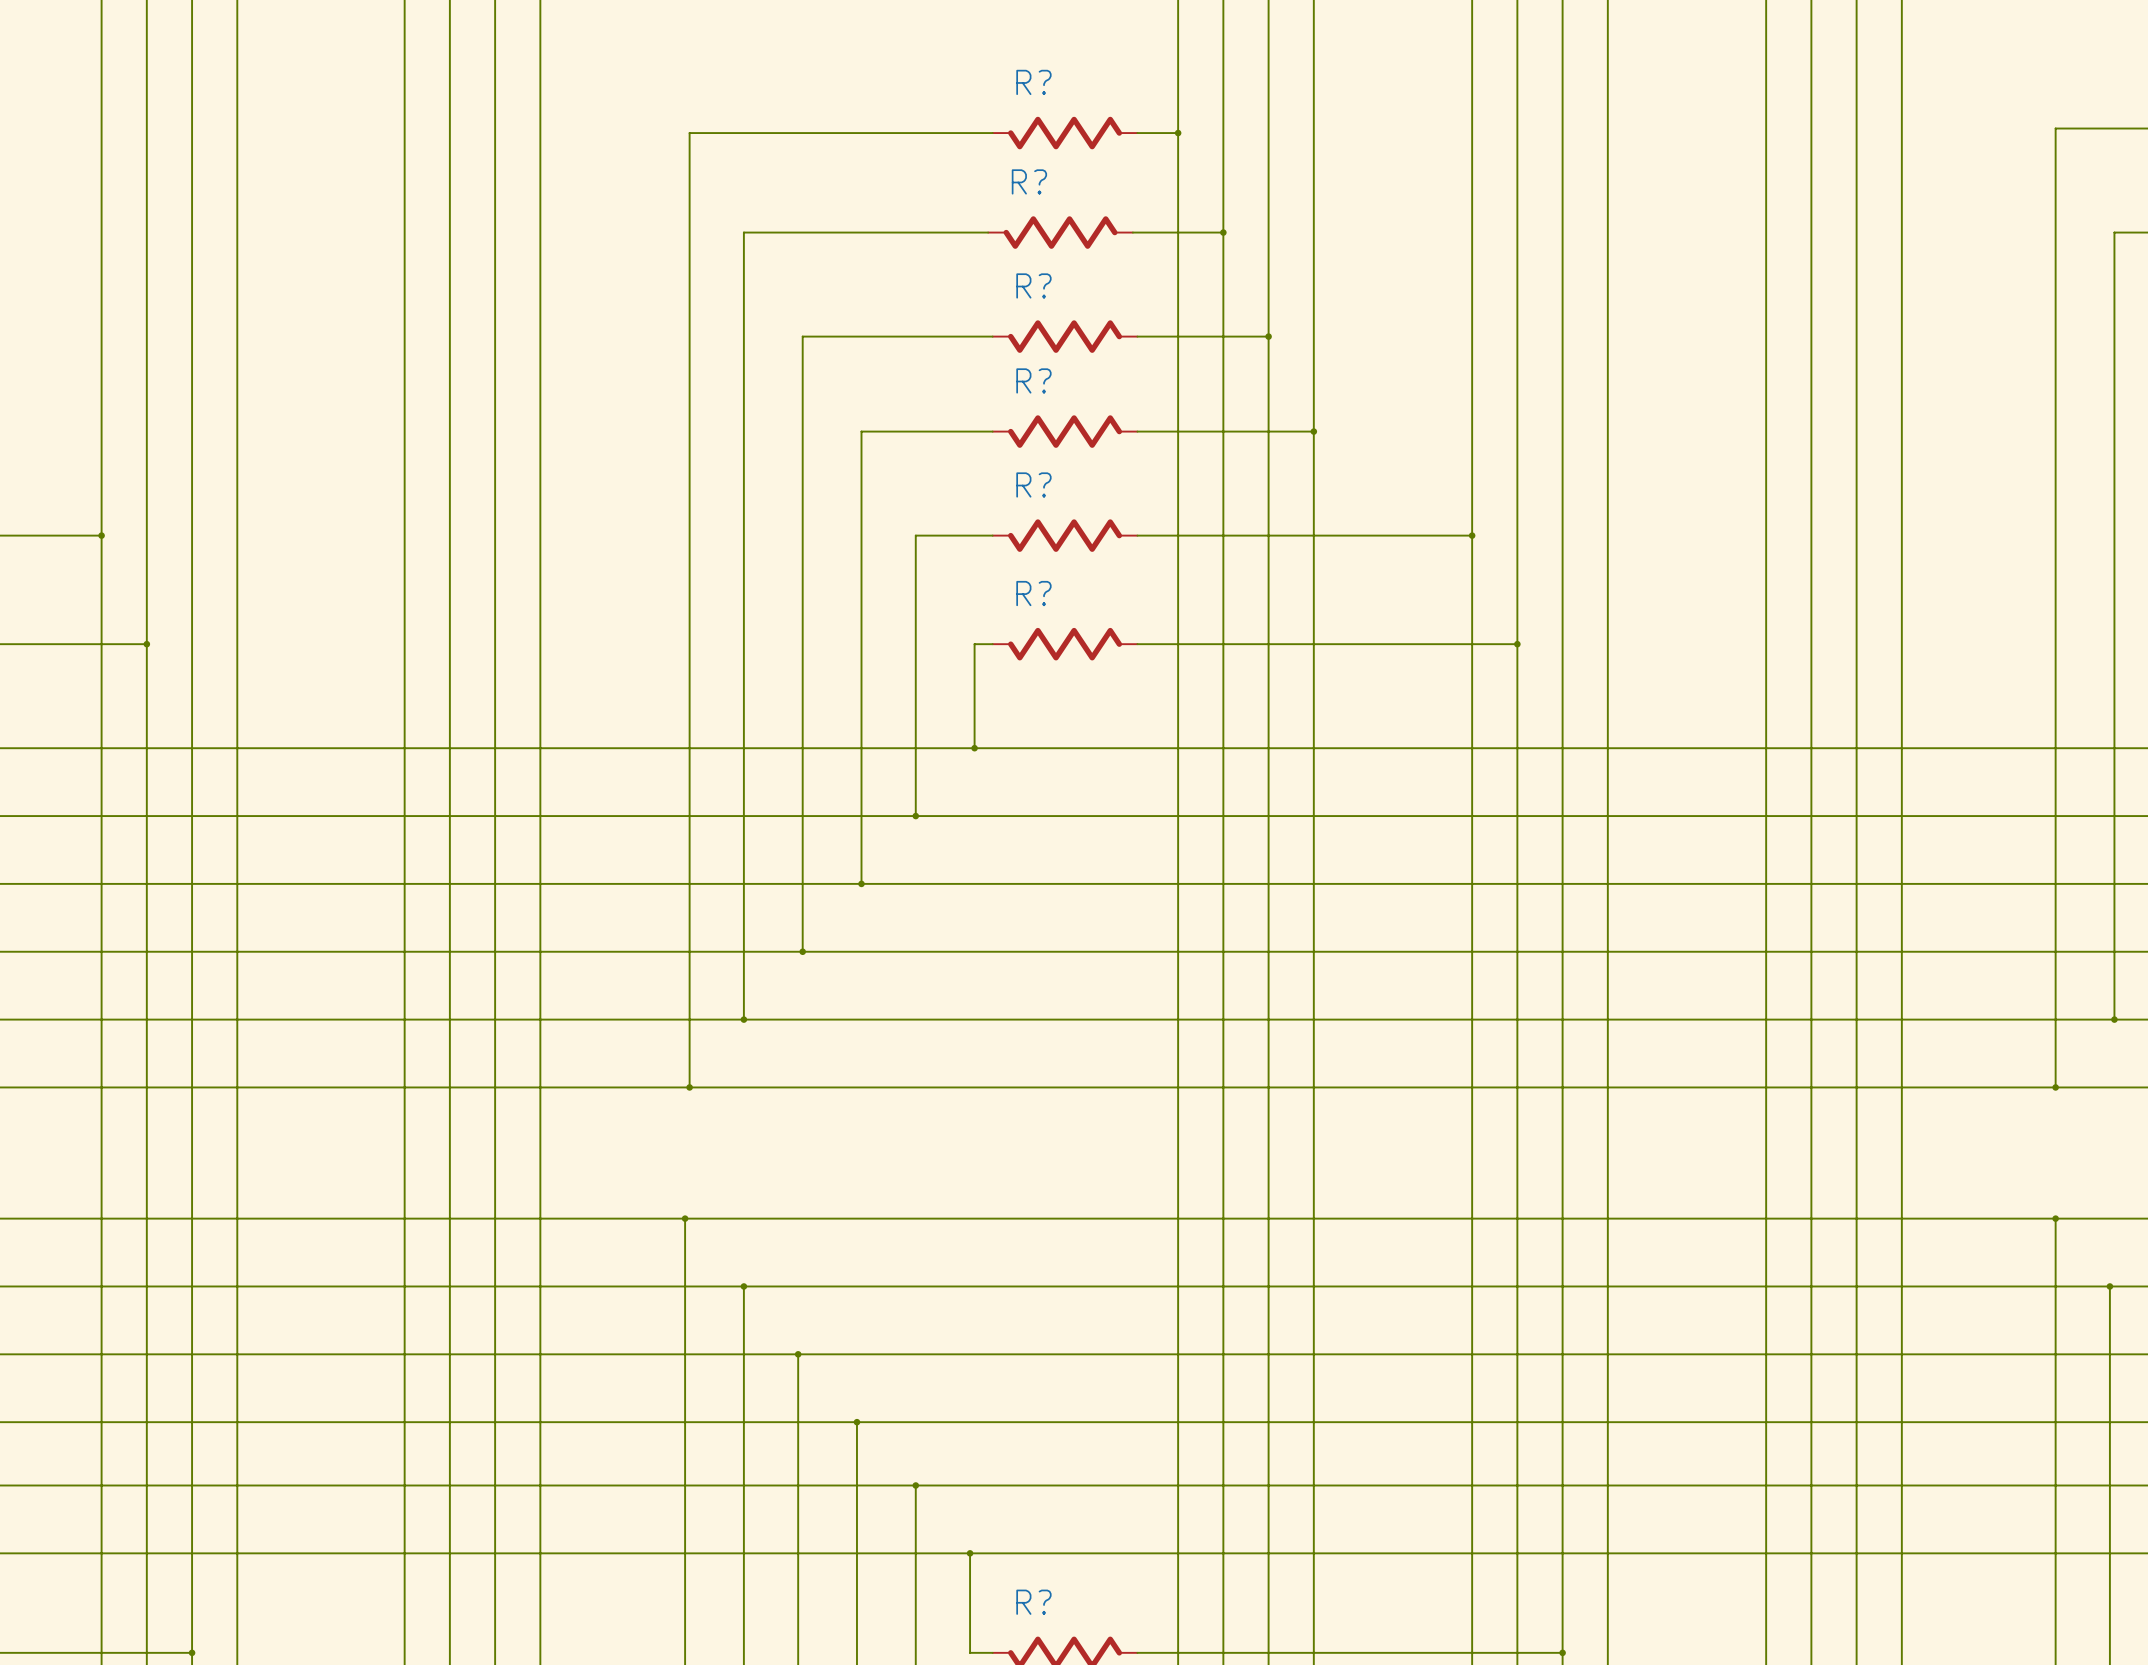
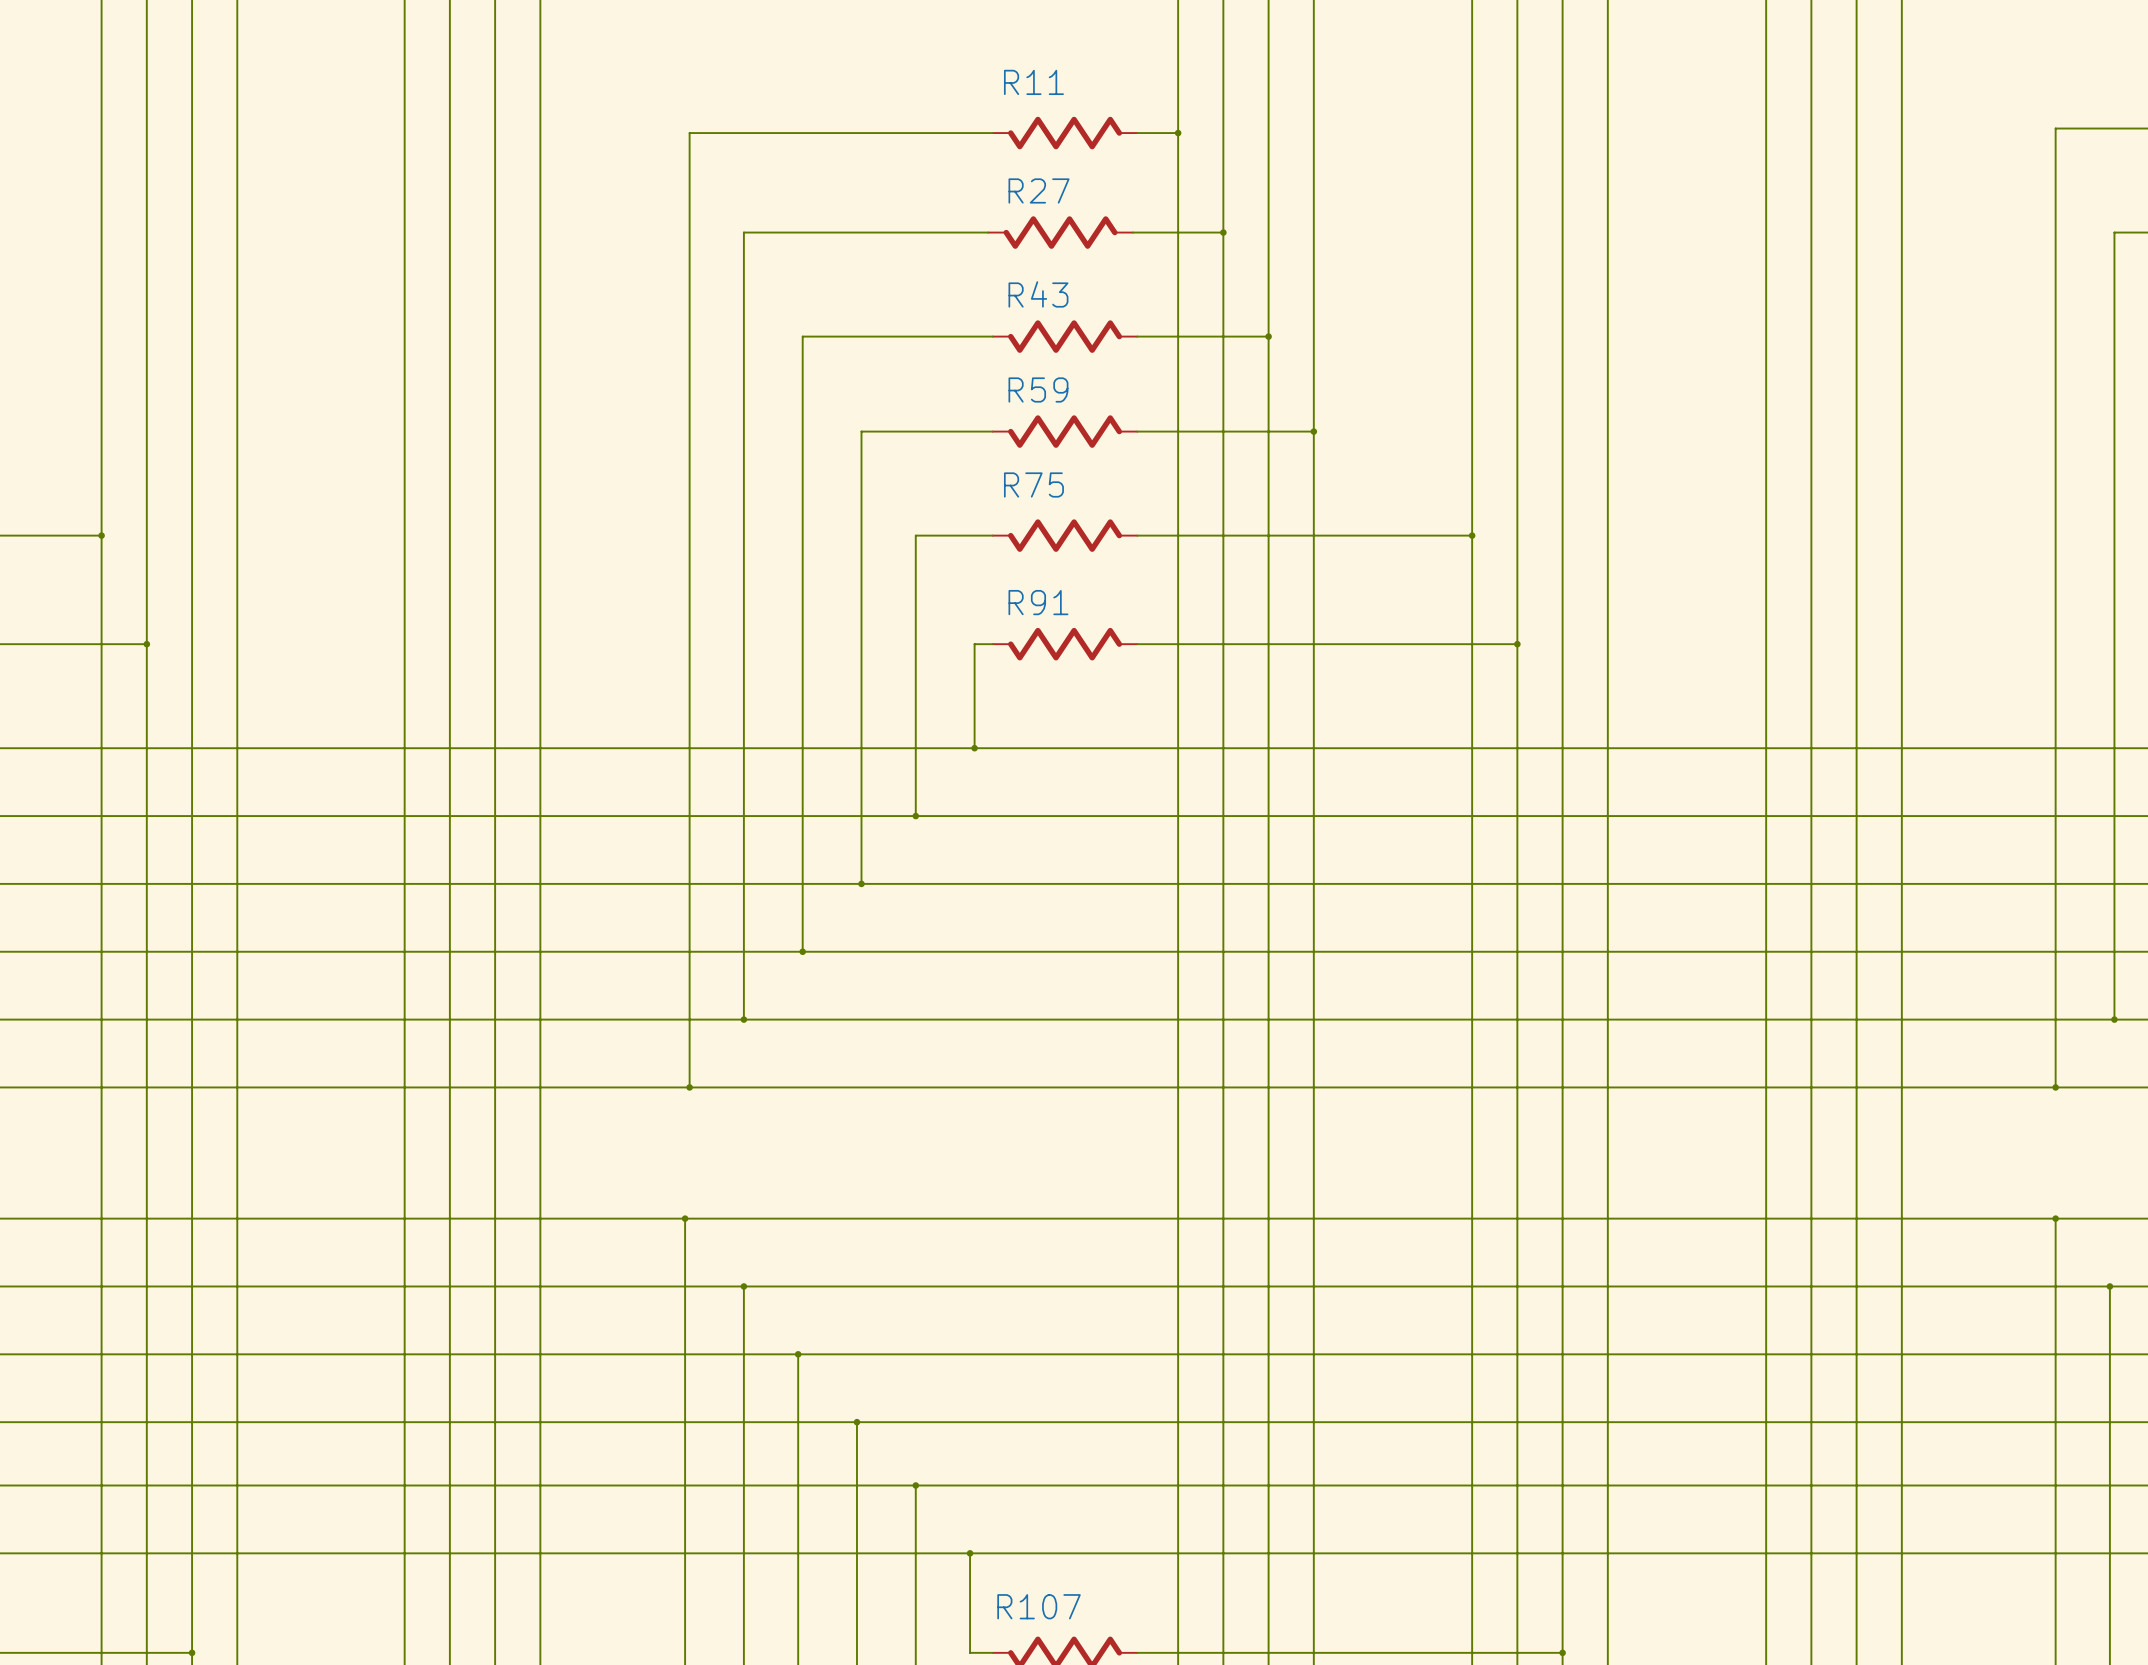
R? name: R? (1033, 82) -> R11 (1033, 82)
R? name: R? (1029, 181) -> R27 (1039, 190)
R? name: R? (1033, 285) -> R43 (1038, 294)
R? name: R? (1033, 380) -> R59 (1038, 389)
R? name: R? (1033, 484) -> R75 (1033, 484)
R? name: R? (1033, 593) -> R91 (1038, 602)
R? name: R? (1033, 1602) -> R107 (1039, 1606)

